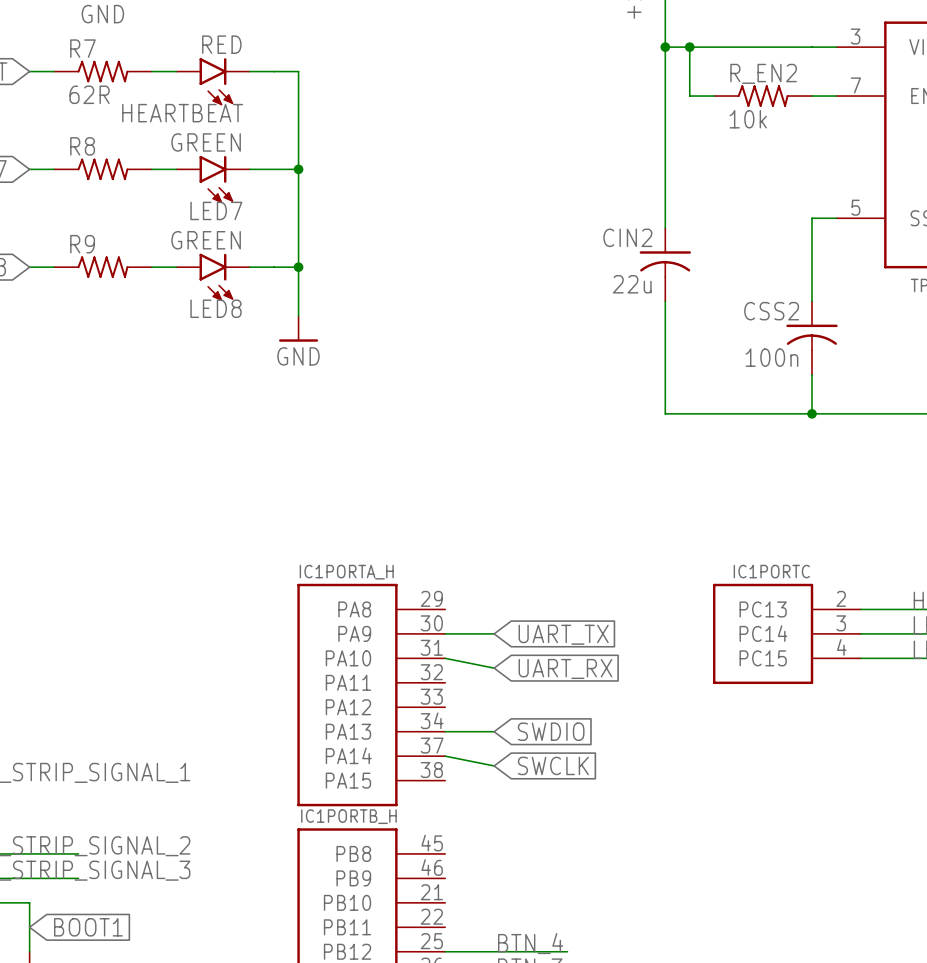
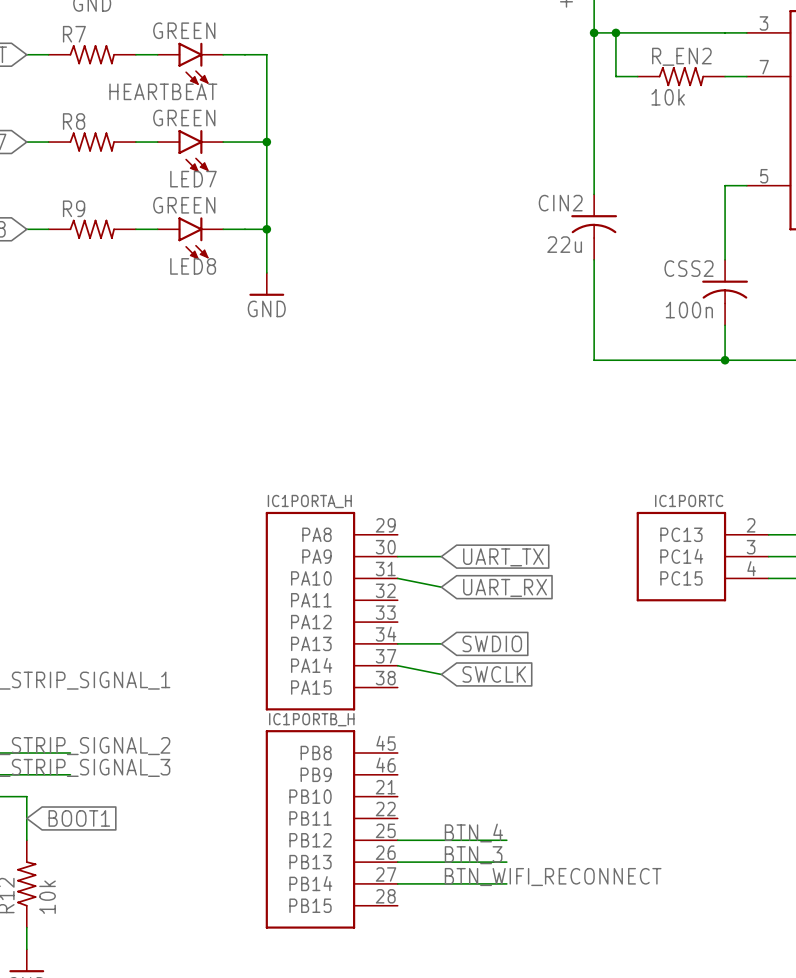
HEARTBEAT value: RED (221, 44) -> GREEN (184, 30)
R7 value: 62R (89, 94) -> none

